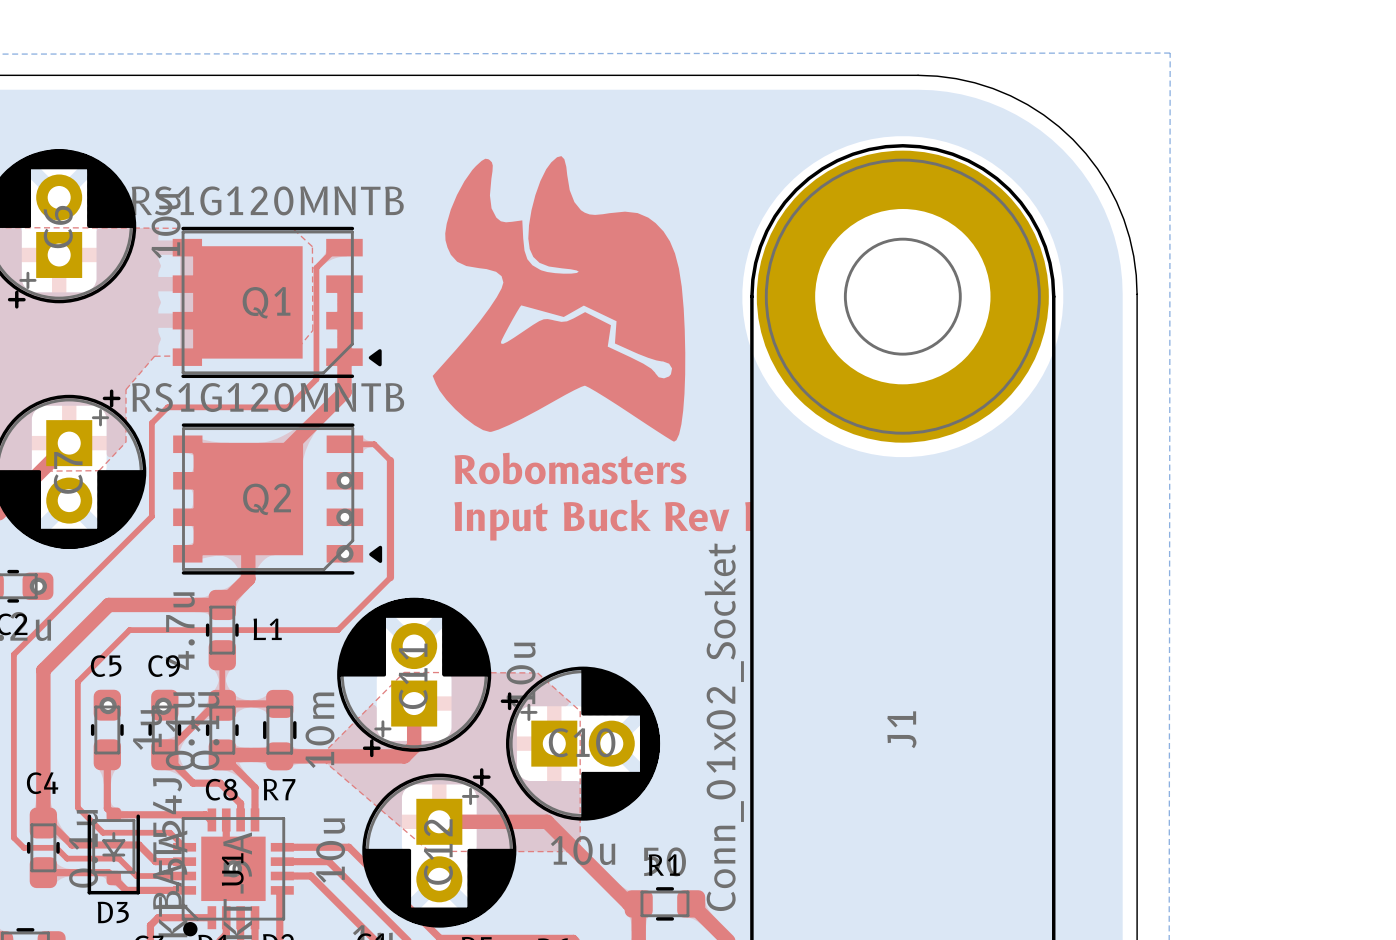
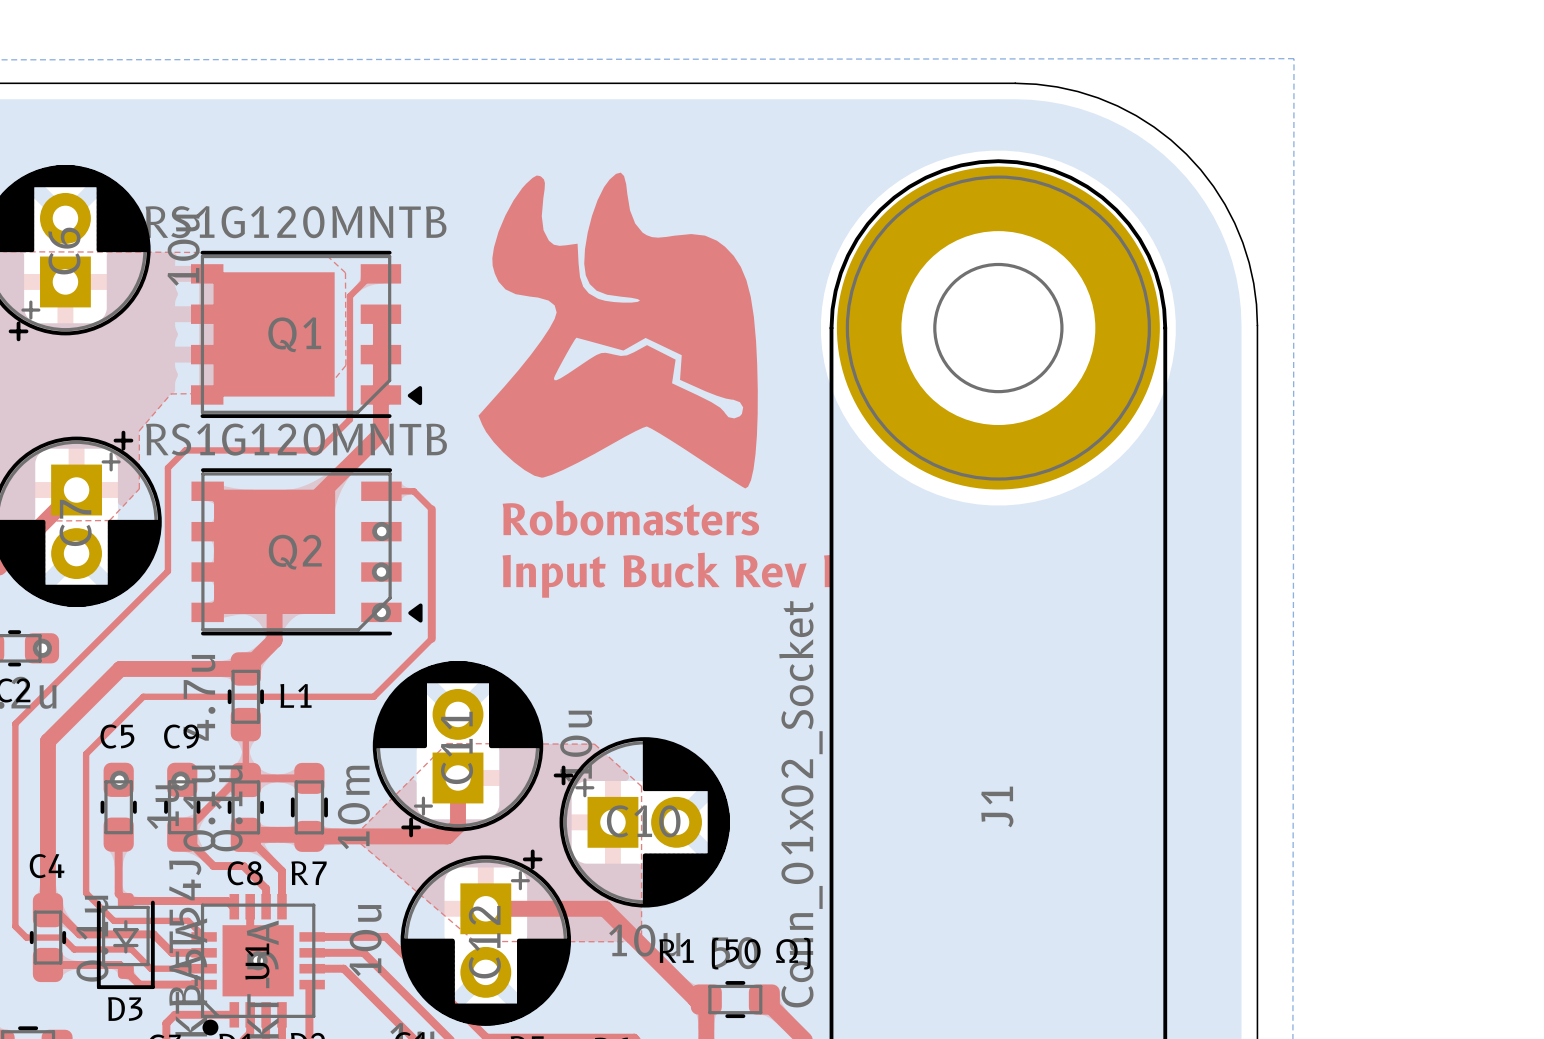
R1 name: R1 (664, 865) -> R1 (50 Ω) (734, 953)

